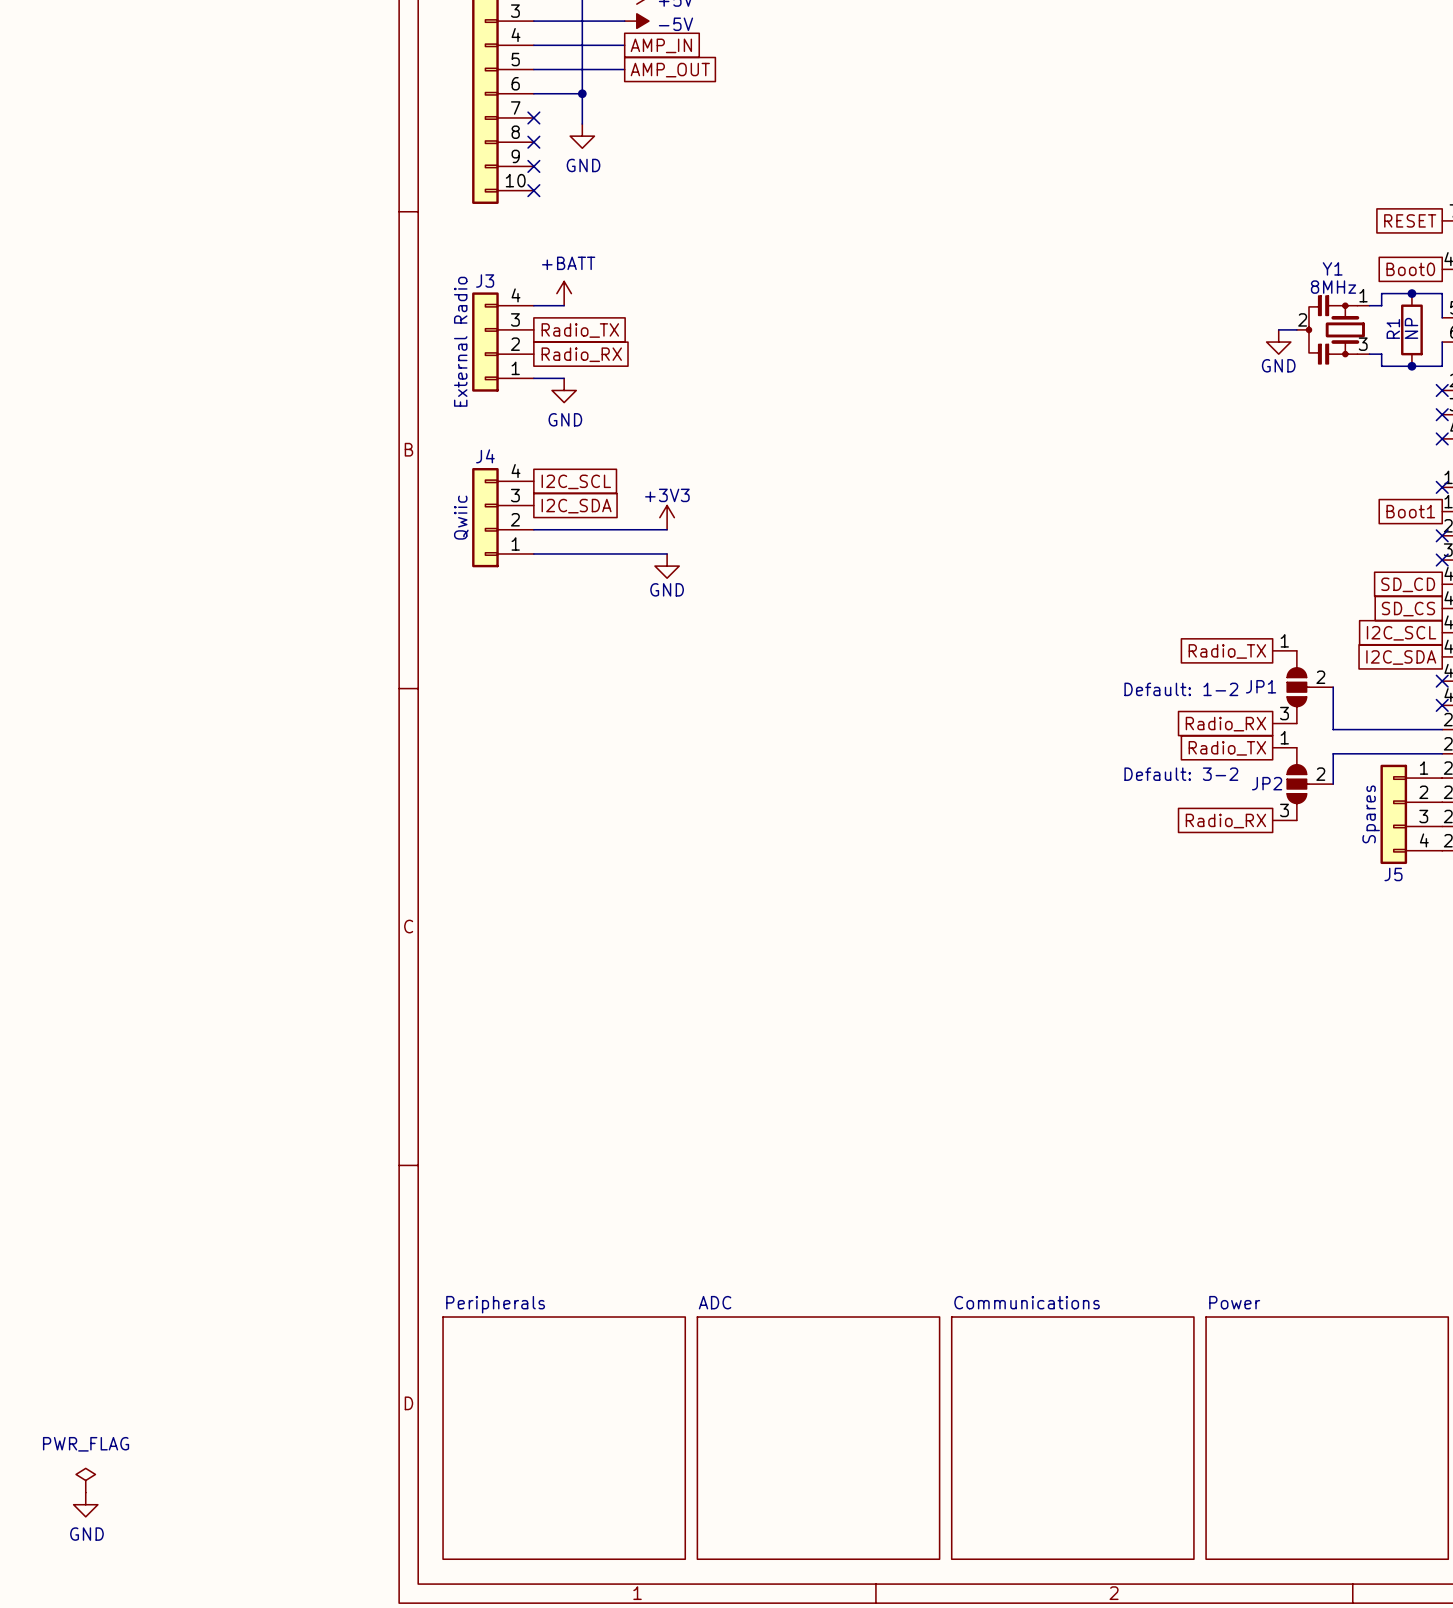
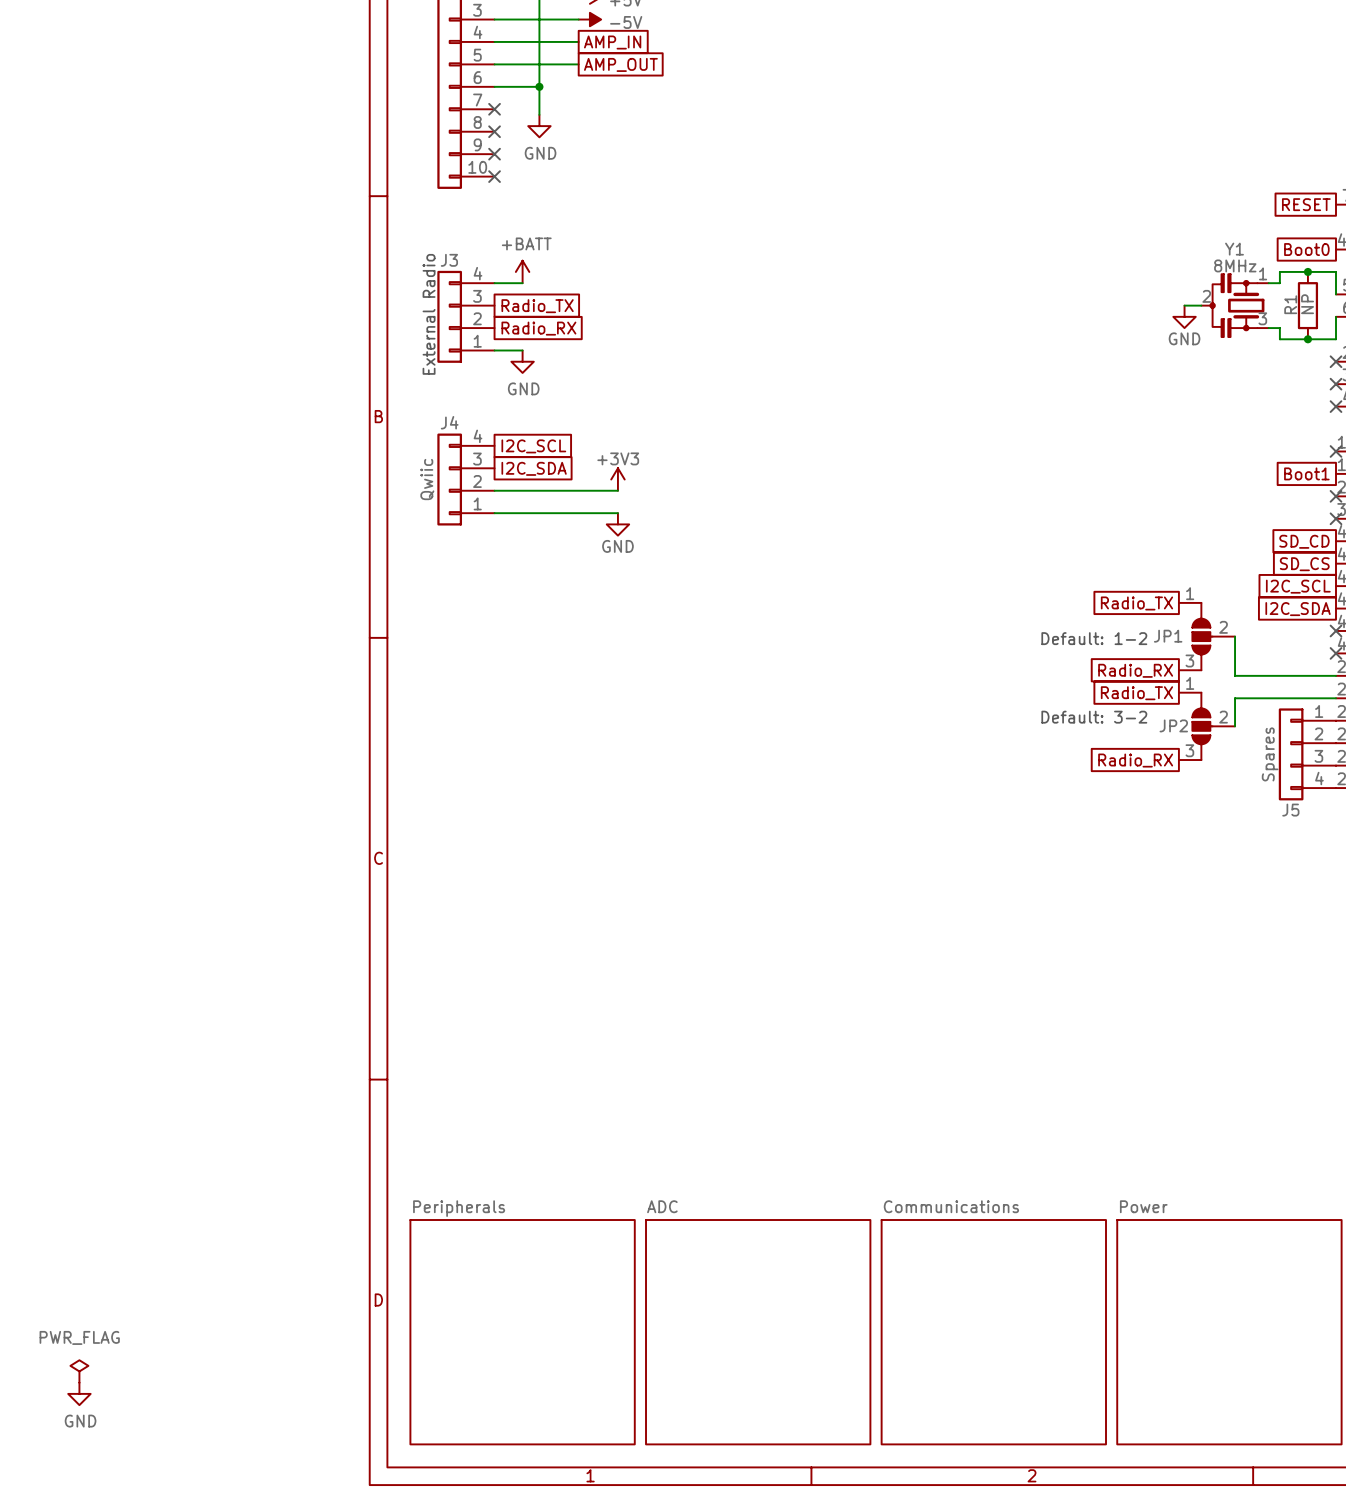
text: none -> External Radio (429, 314)
J3 text: External Radio (460, 341) -> none

